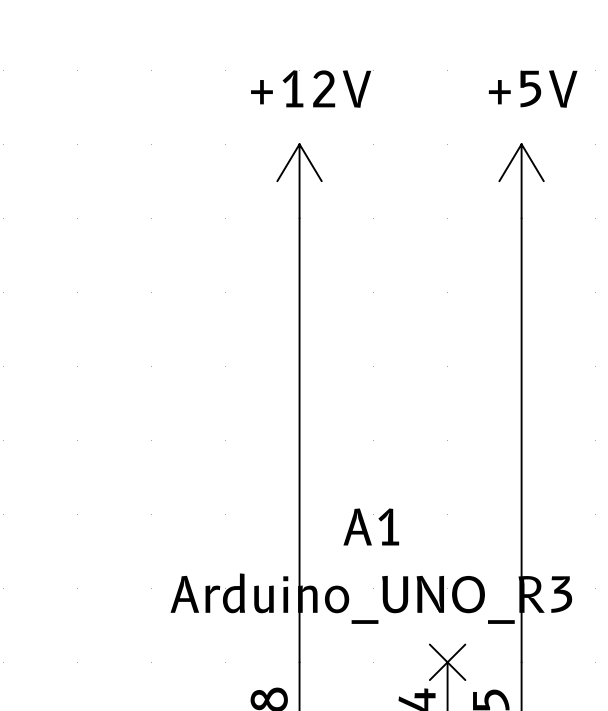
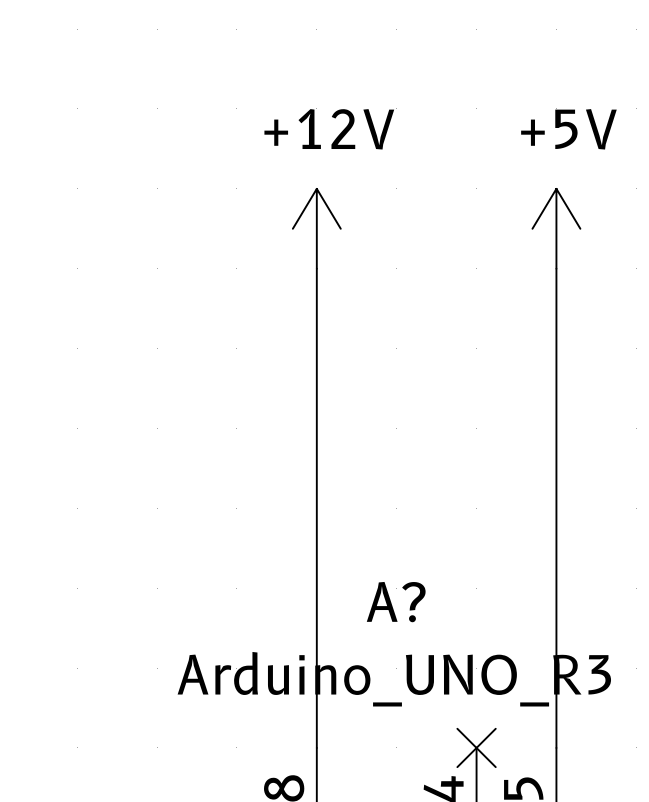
A1 name: A1 (371, 526) -> A? (396, 602)

